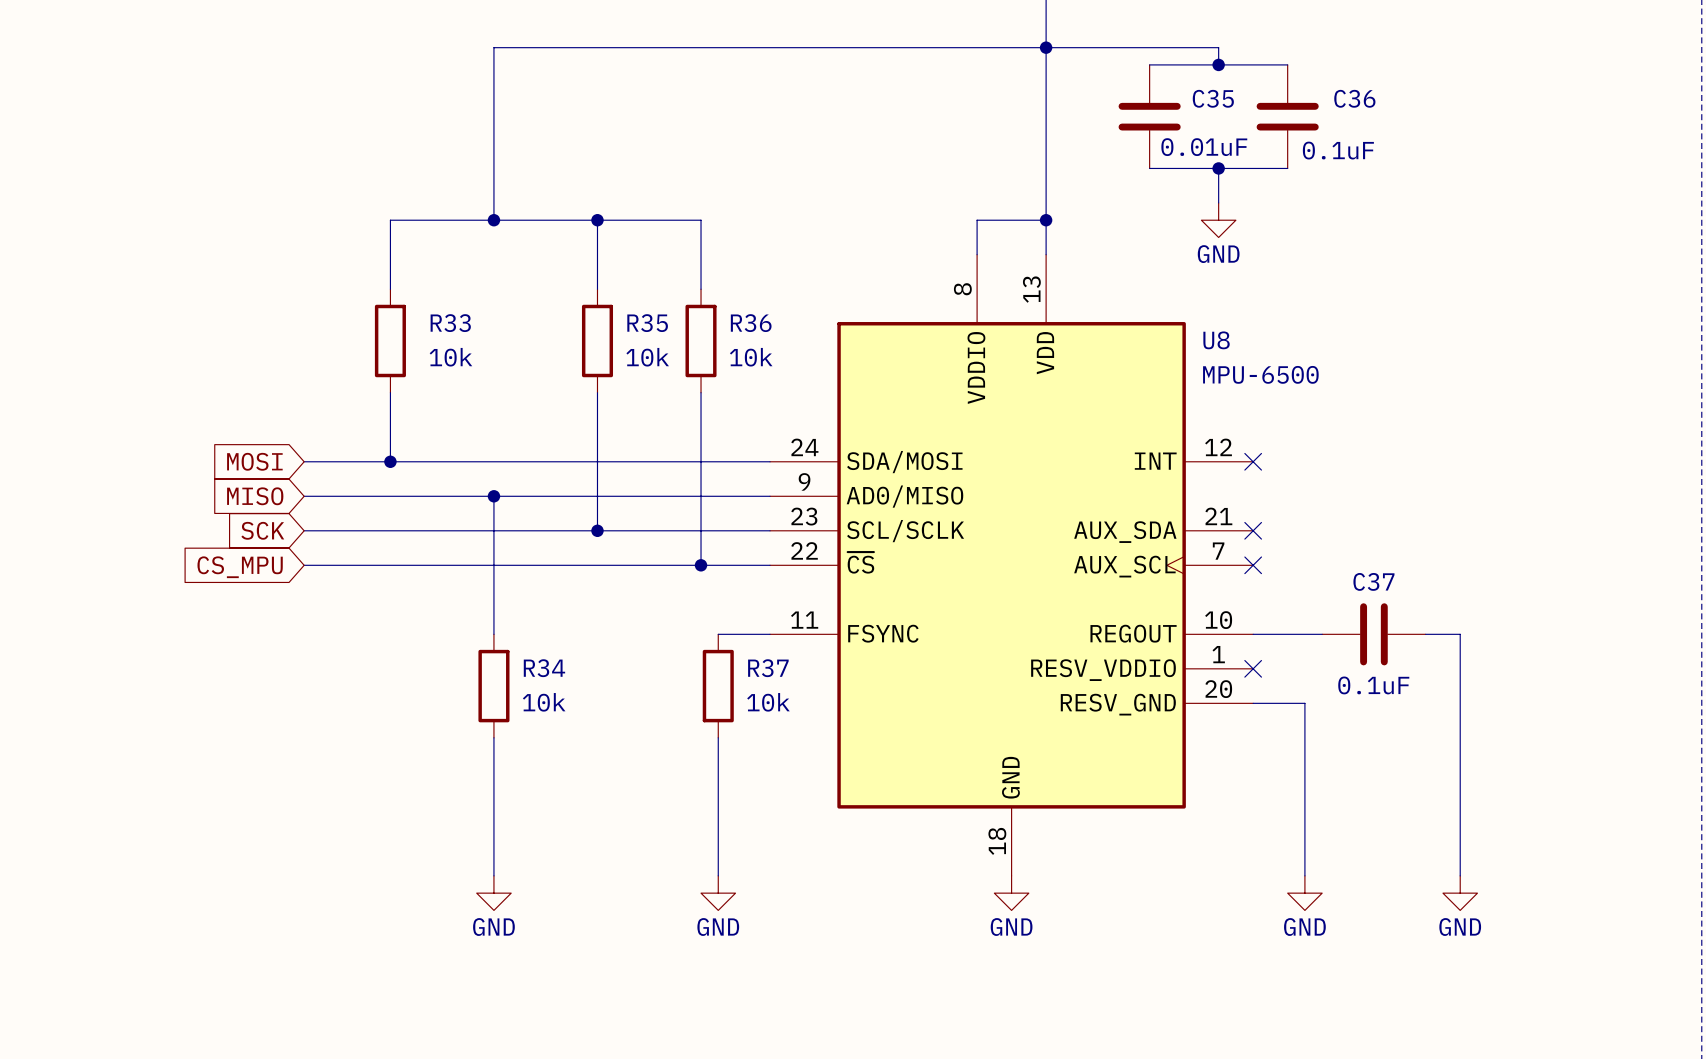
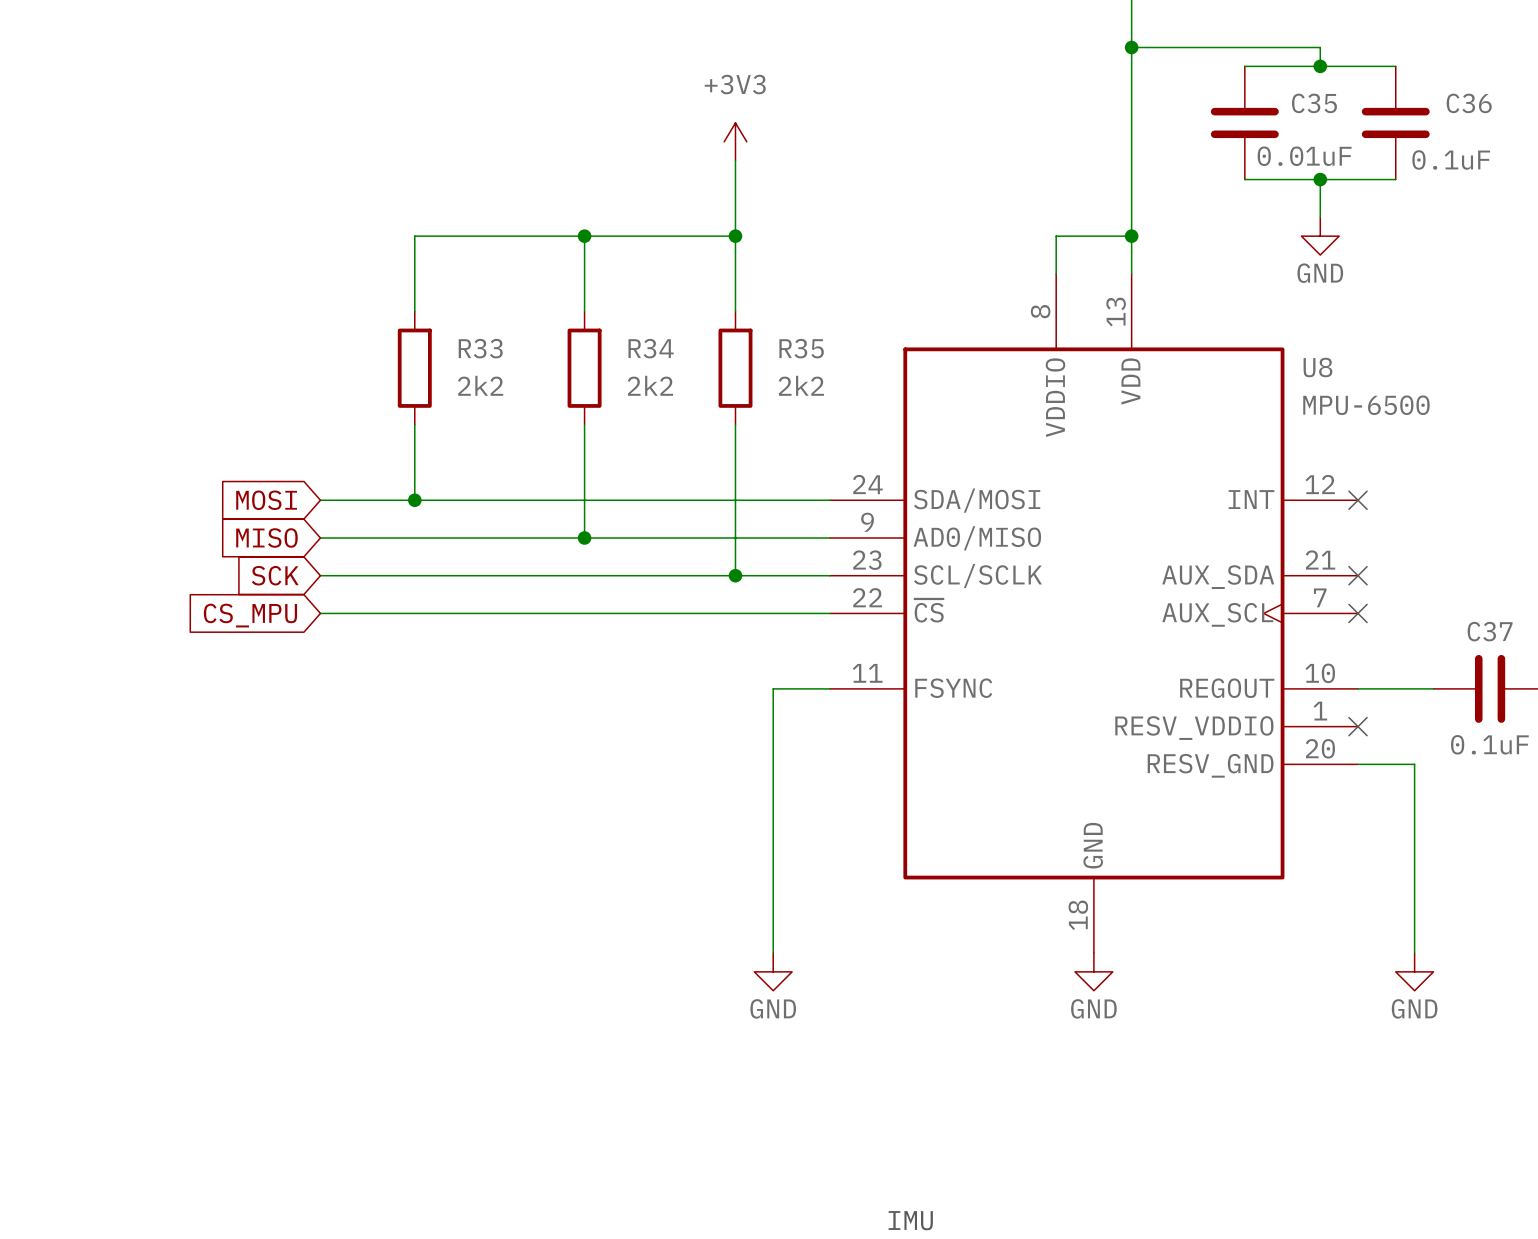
wire: (1046, 47) (493, 47) (493, 220) -> none
power symbol: none -> +3V3 (735, 141)
wire: none -> (735, 160) (735, 311)
junction: (493, 220) -> none
junction: none -> (584, 236)
wire: (597, 220) (597, 289) -> (584, 236) (584, 311)
junction: (597, 220) -> none
wire: (683, 220) (701, 220) (701, 289) -> none
junction: none -> (735, 236)
R35 name position: R35 (647, 323) -> R35 (801, 348)
R35 position: (597, 341) -> (735, 368)
R36: 10k (701, 341) -> none
R33 value: 10k (450, 357) -> 2k2 (480, 385)
R35 value: 10k (647, 357) -> 2k2 (801, 385)
wire: none -> (584, 424) (584, 537)
wire: (597, 392) (597, 530) -> (735, 424) (735, 575)
wire: (701, 392) (701, 565) -> none
wire: (493, 496) (493, 634) -> none
junction: (493, 496) -> none
junction: none -> (584, 537)
junction: (597, 530) -> none
junction position: (701, 565) -> (735, 575)
wire: none -> (773, 688) (773, 802)
R34 name position: R34 (544, 668) -> R34 (651, 348)
R34 position: (493, 686) -> (584, 368)
R37: 10k (718, 686) -> none
R34 value: 10k (544, 702) -> 2k2 (650, 385)
wire: (493, 737) (493, 875) -> none
power symbol: GND (493, 893) -> none

